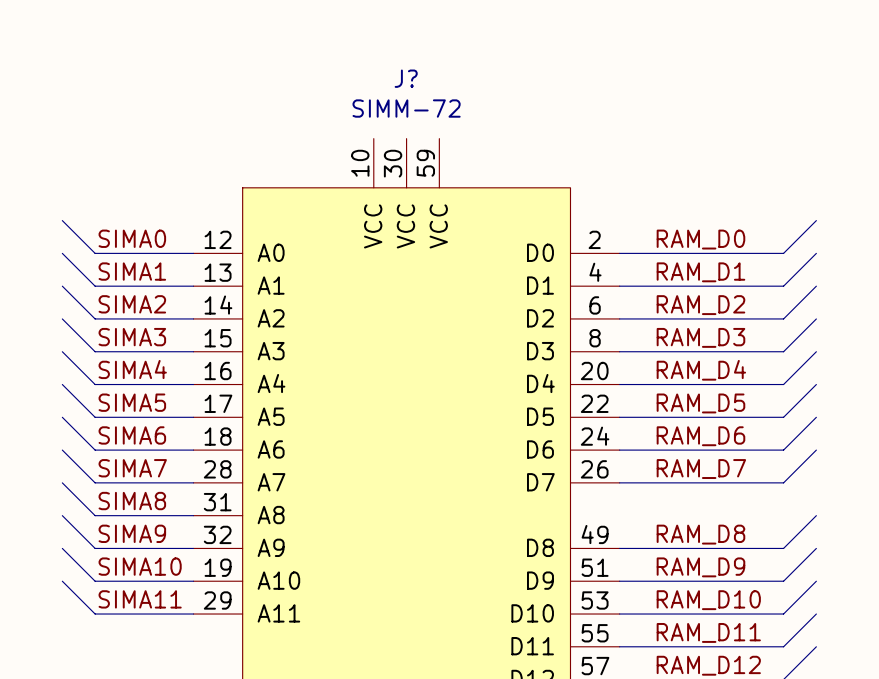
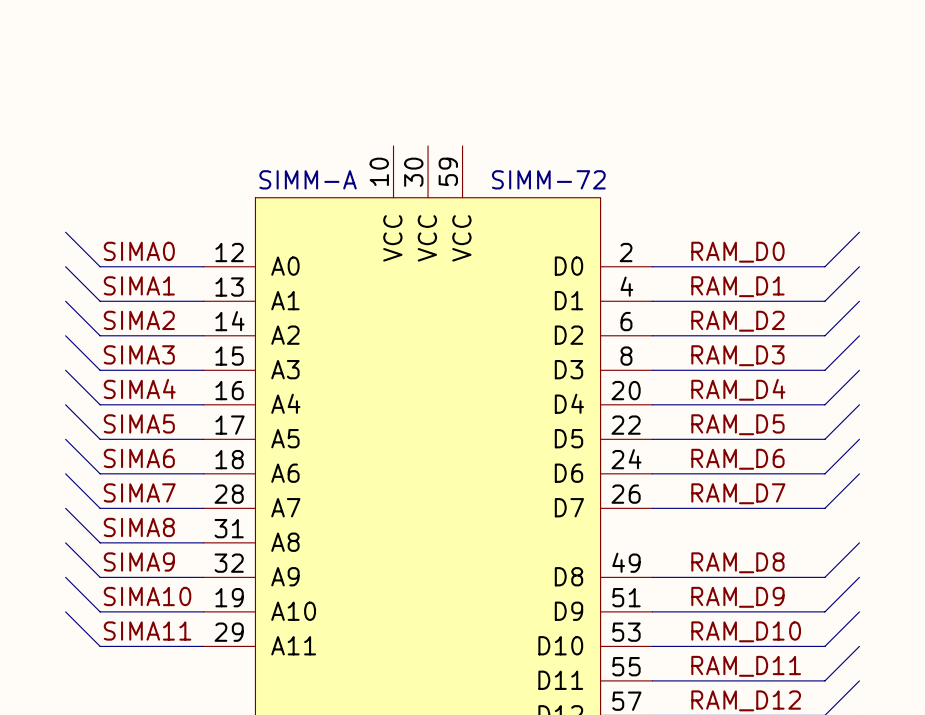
J? name: J? (406, 78) -> SIMM-A (308, 179)
J? value position: SIMM-72 (406, 108) -> SIMM-72 (548, 179)

